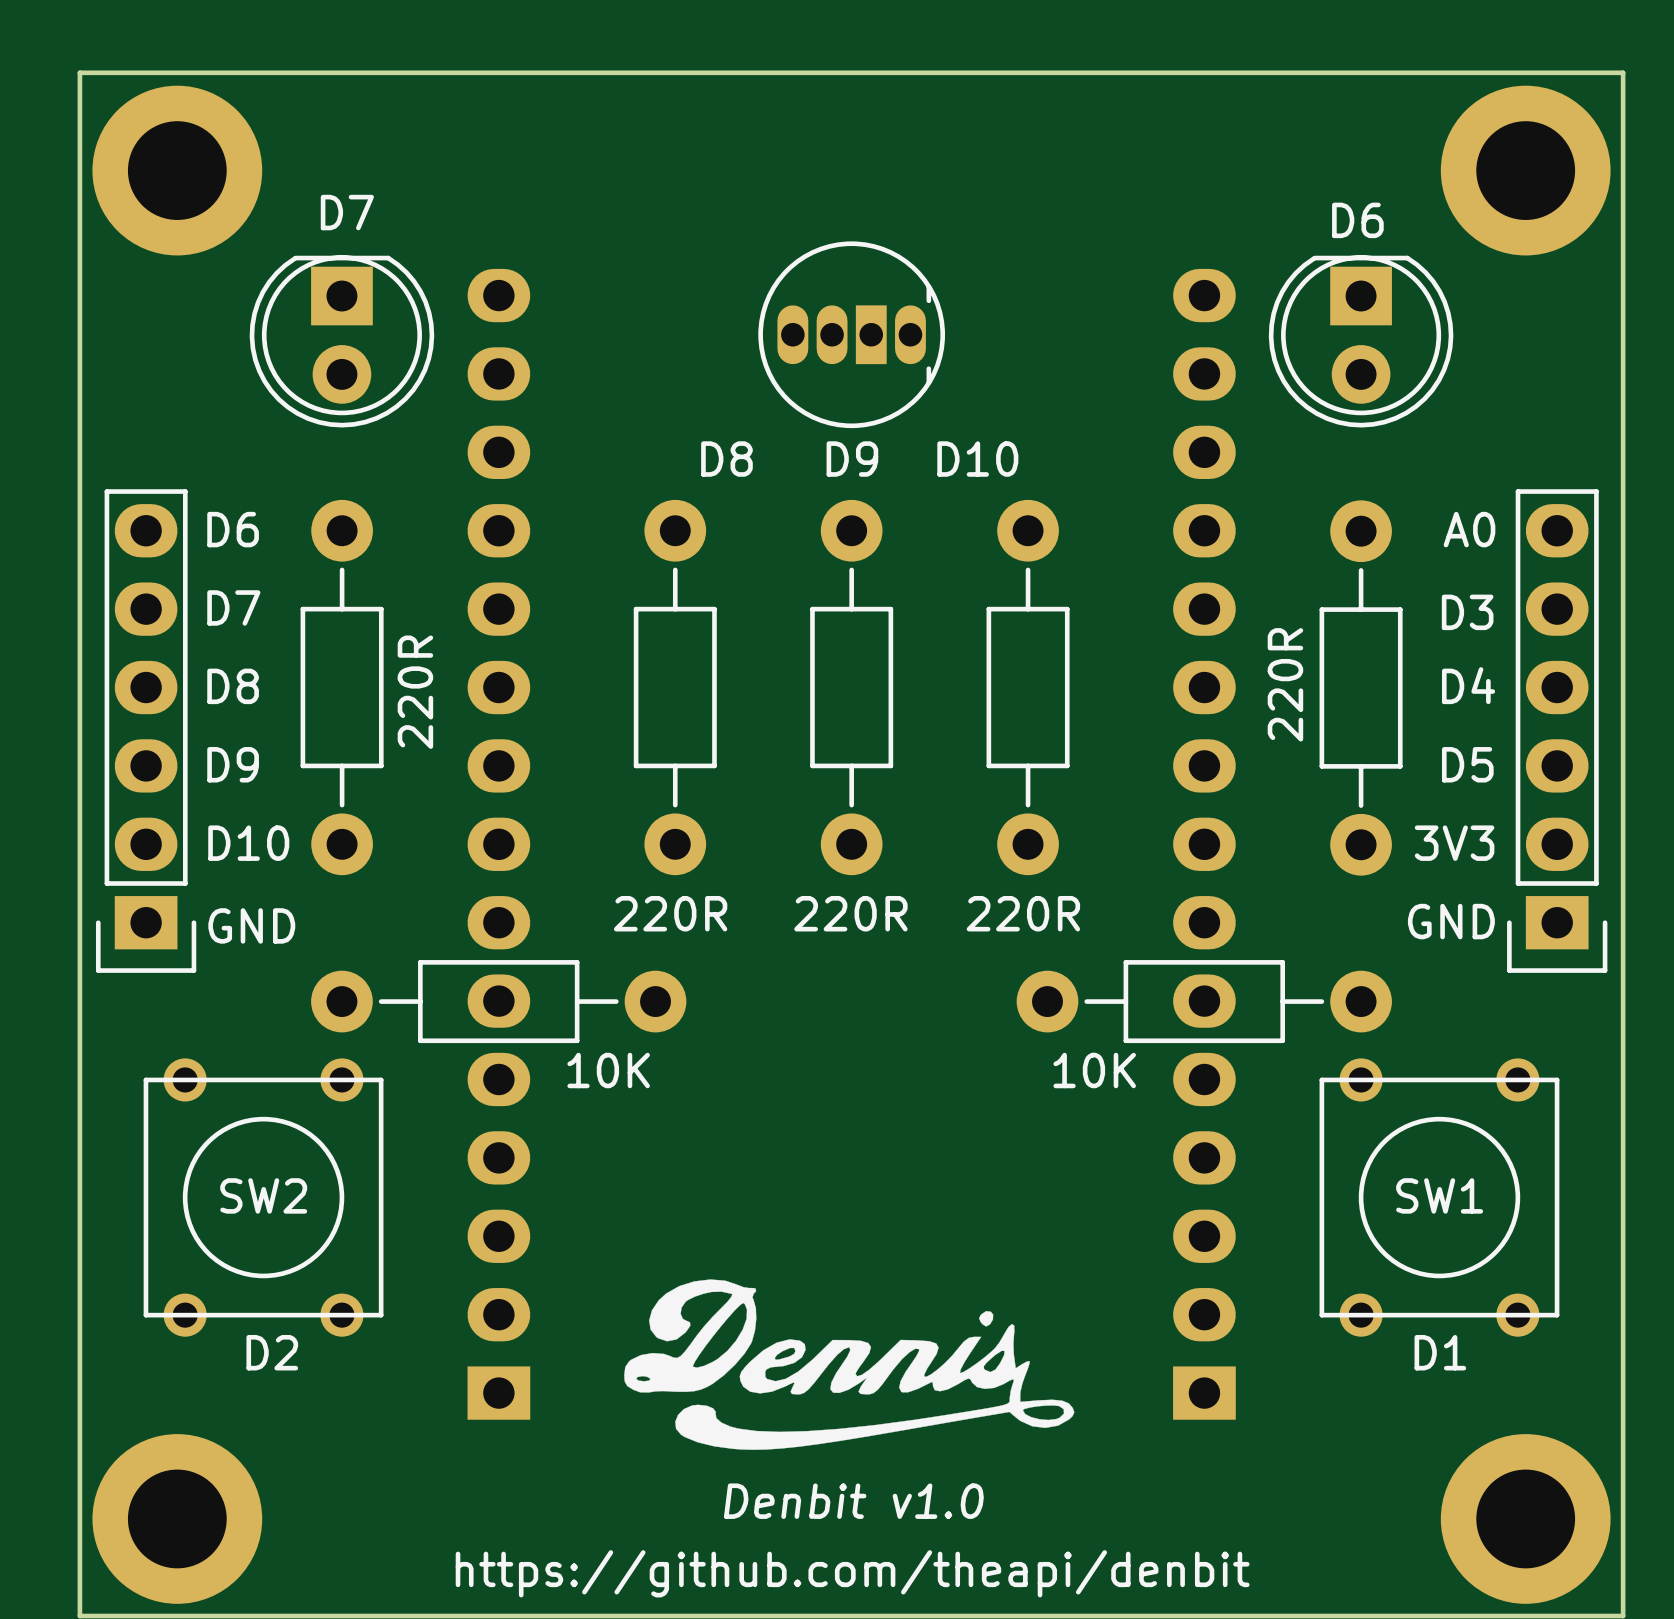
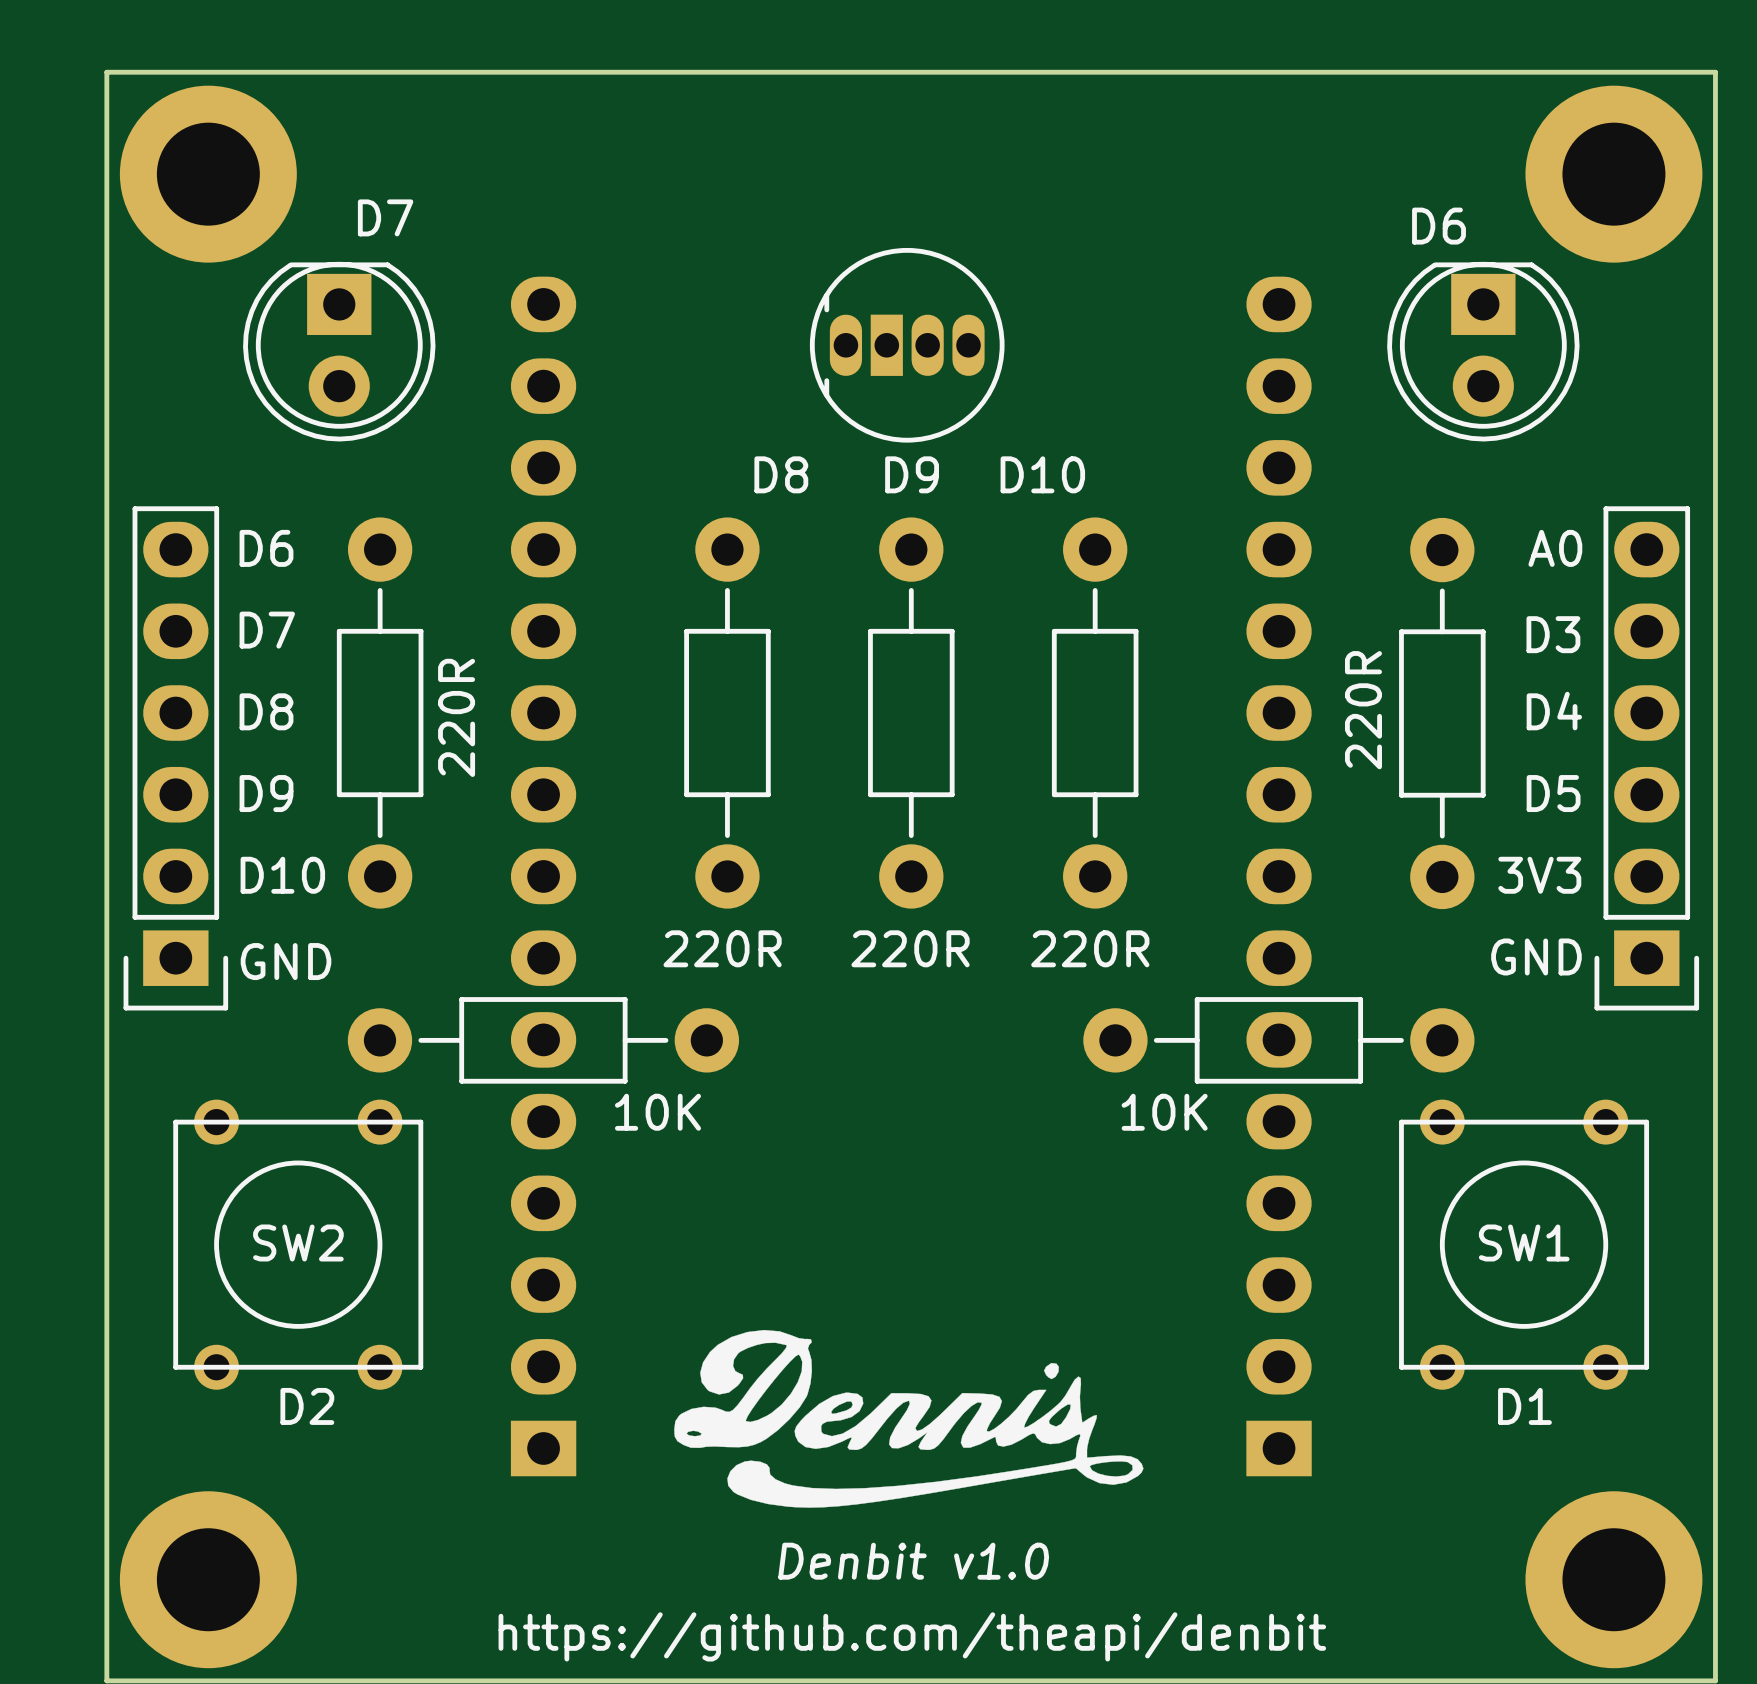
part rotation: 0° (851, 334) -> 180° (907, 345)
part position: (341, 341) -> (339, 351)
part position: (1361, 341) -> (1483, 351)

